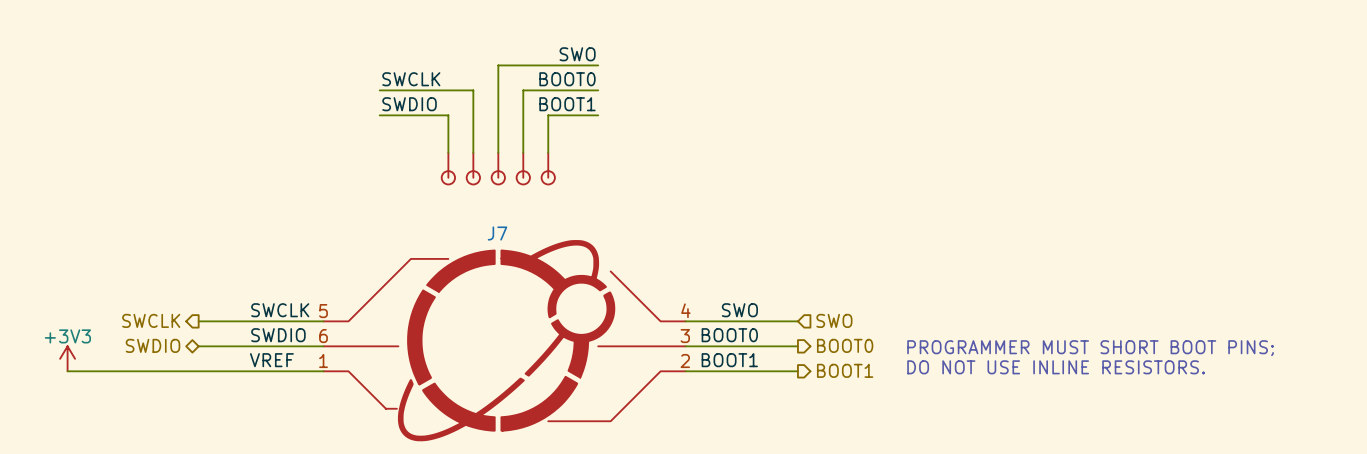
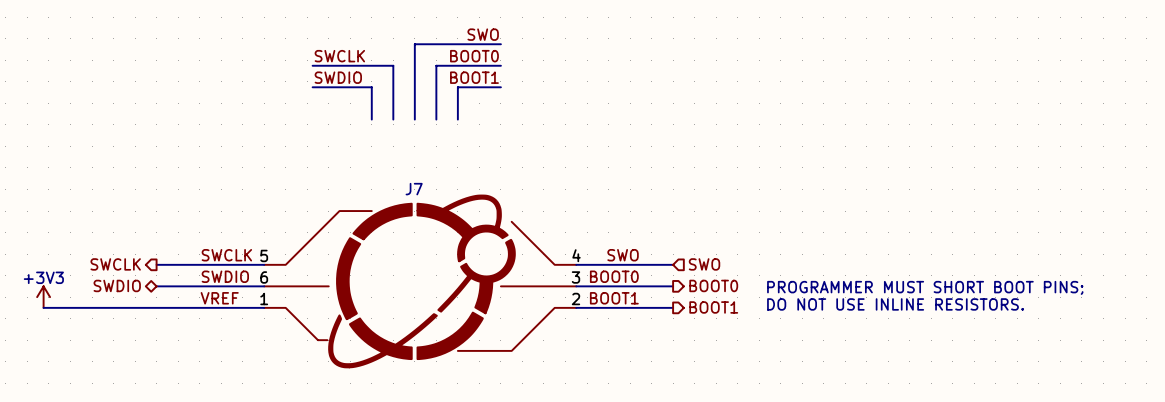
part: (448, 168) -> none
part: (473, 168) -> none
part: (498, 168) -> none
part: (523, 168) -> none
part: (548, 168) -> none

